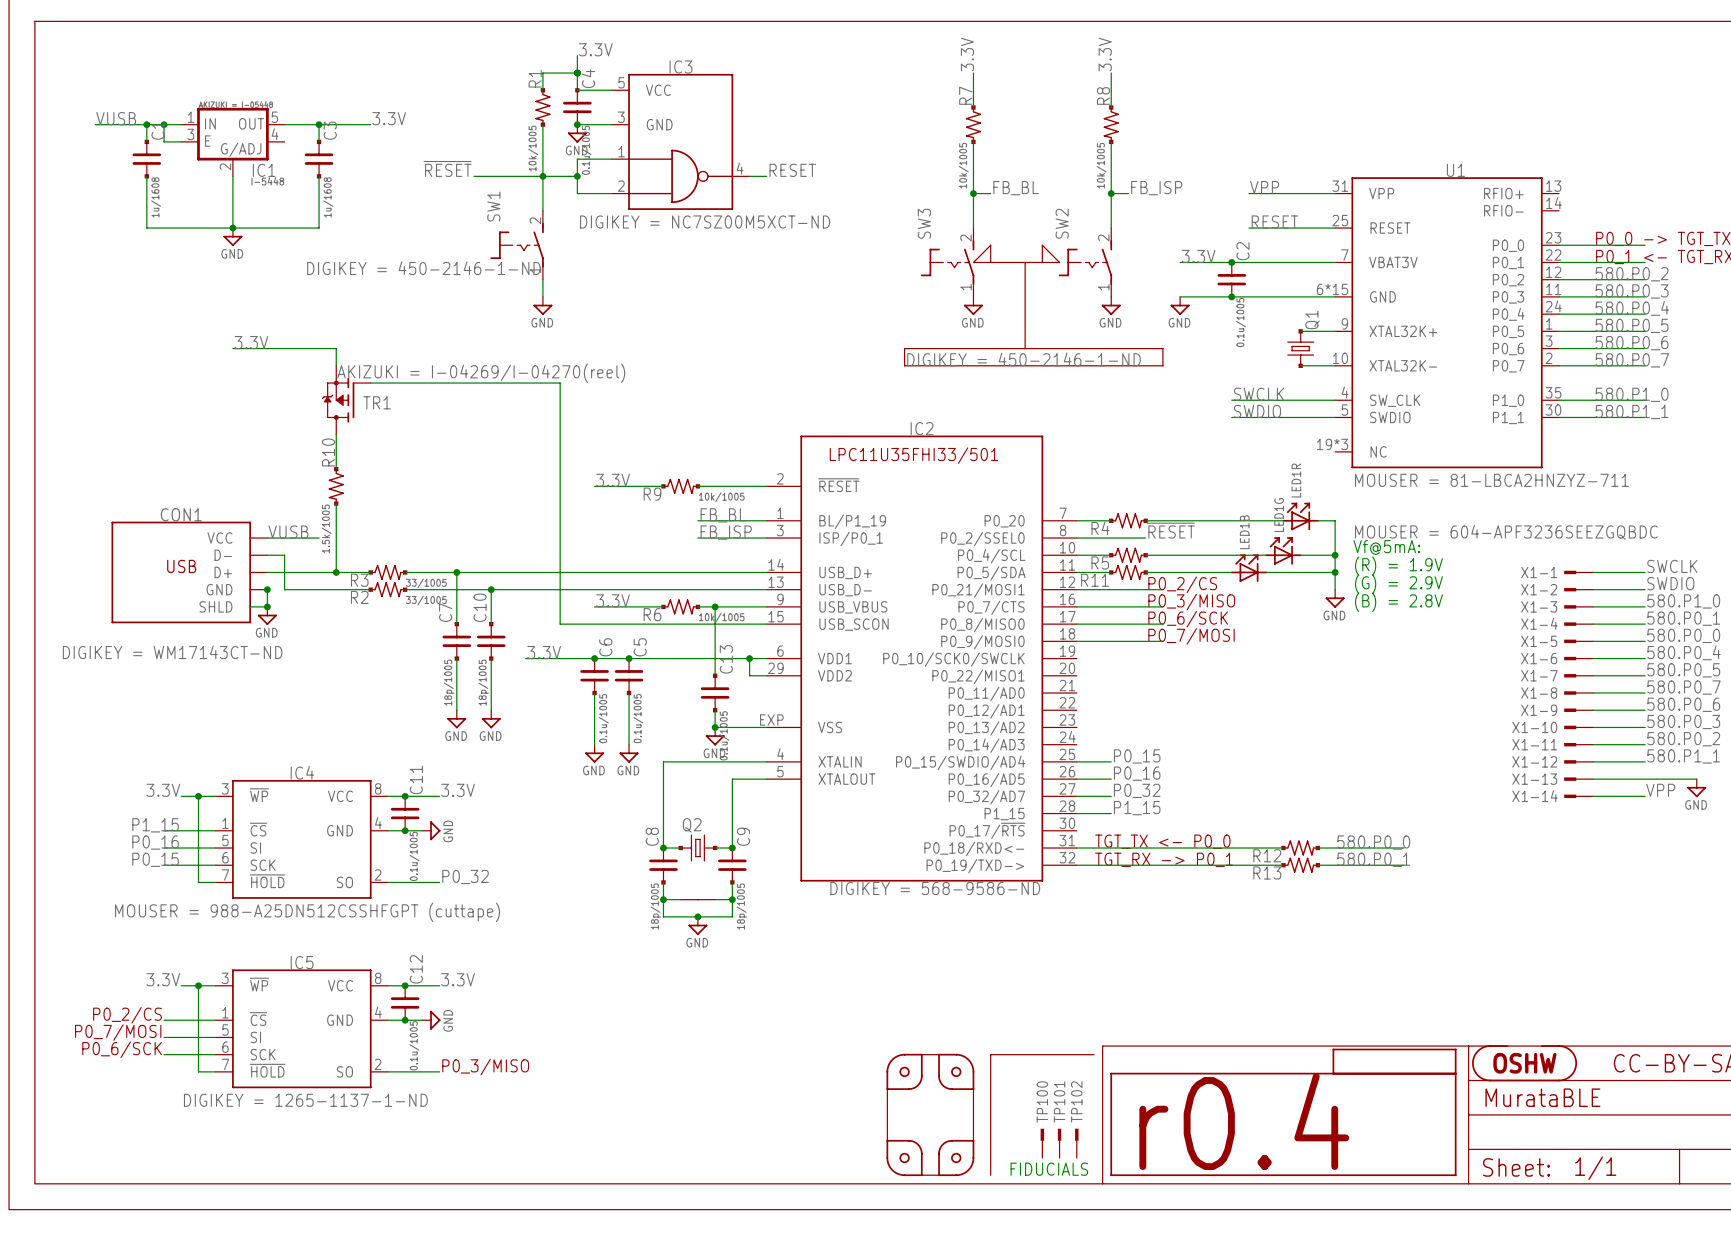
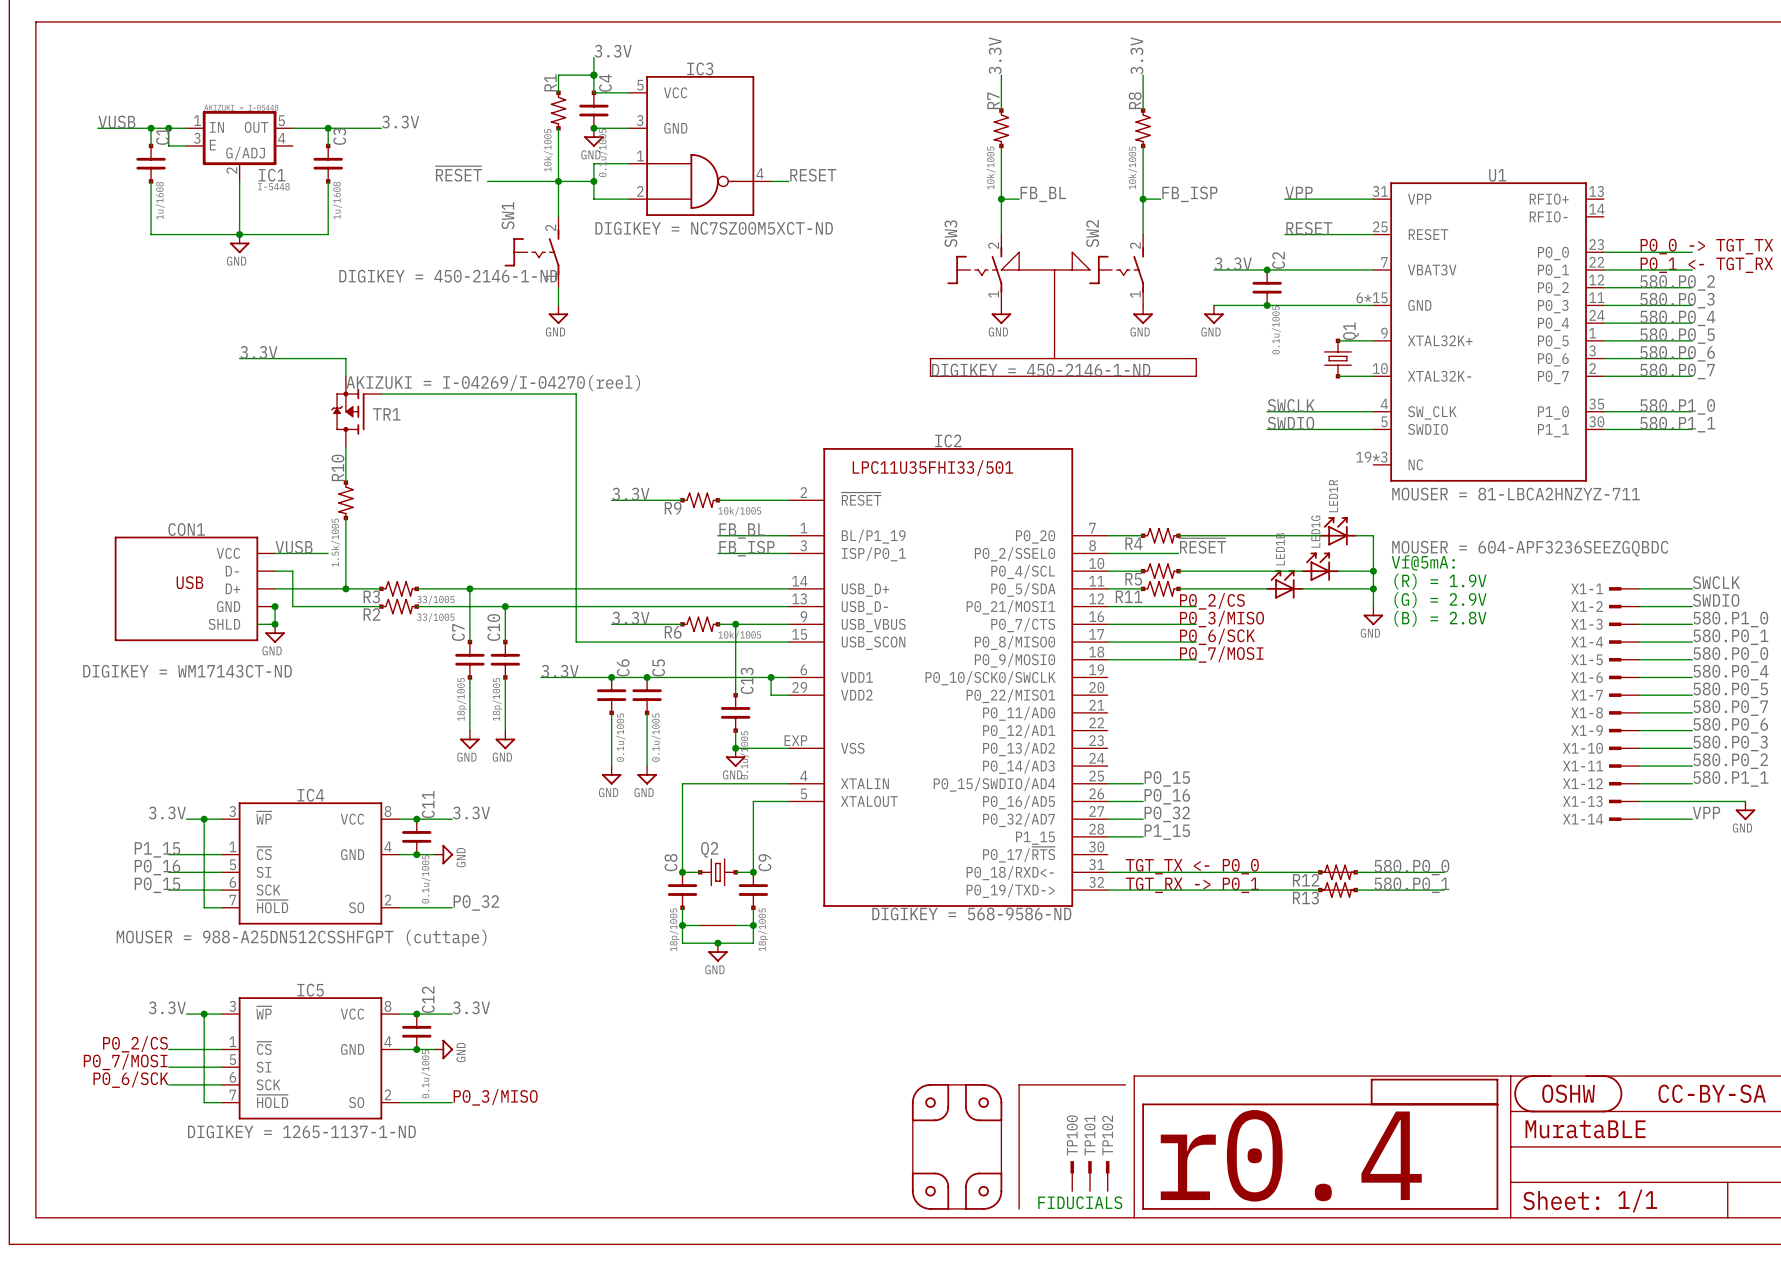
line: none -> (1320, 872) (1355, 872)
line: none -> (1320, 890) (1355, 890)

